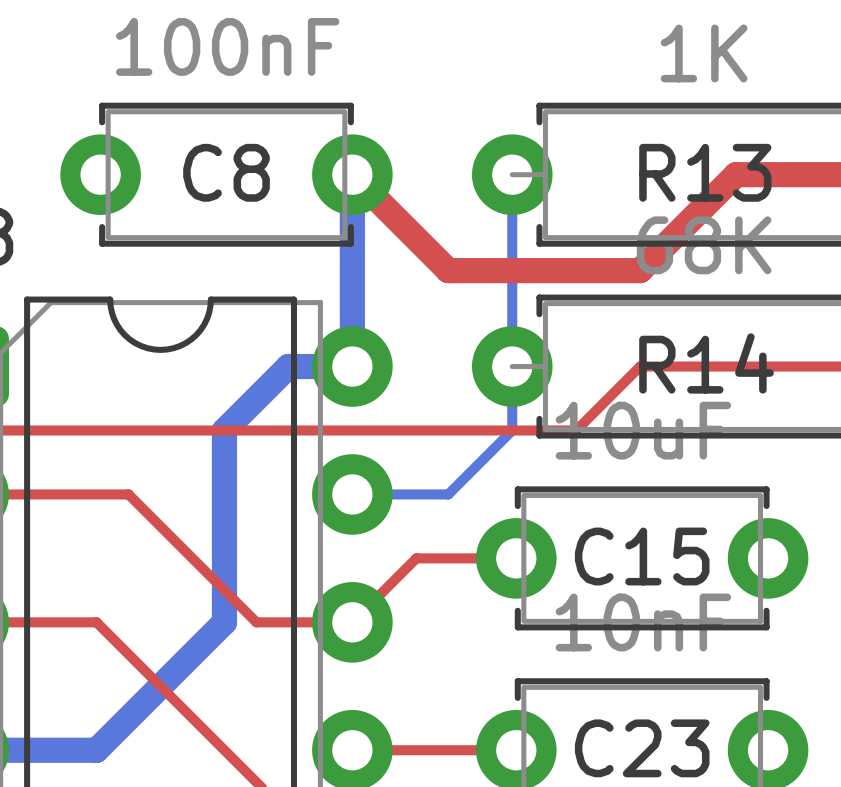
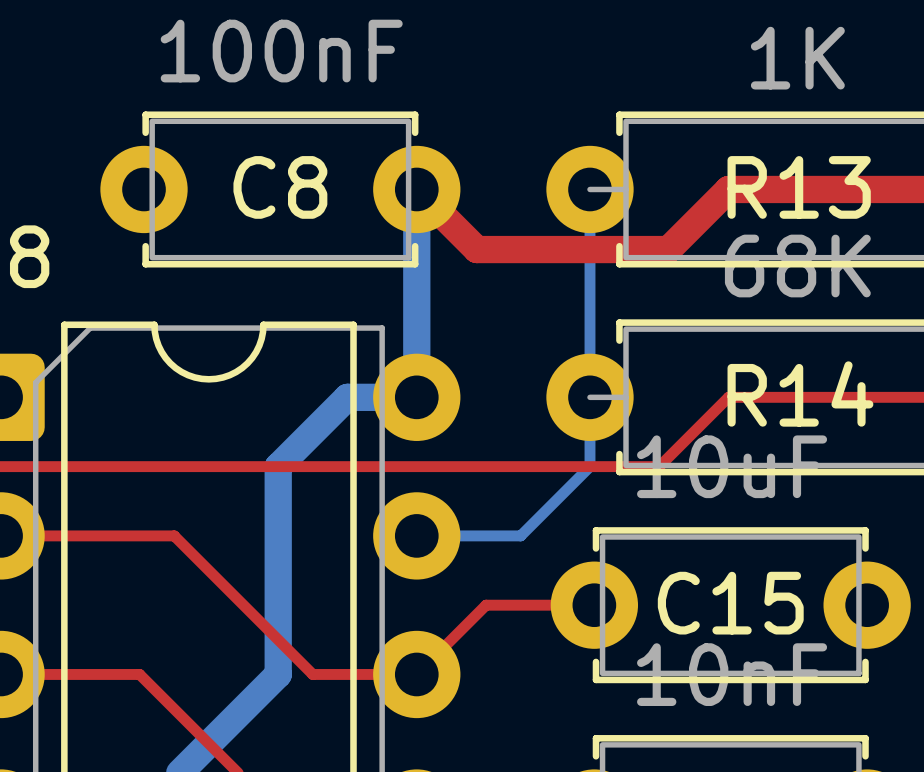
top track: (736, 174) (640, 270) (448, 270) (407, 230) -> (832, 189) (728, 189) (668, 249) (476, 249)

